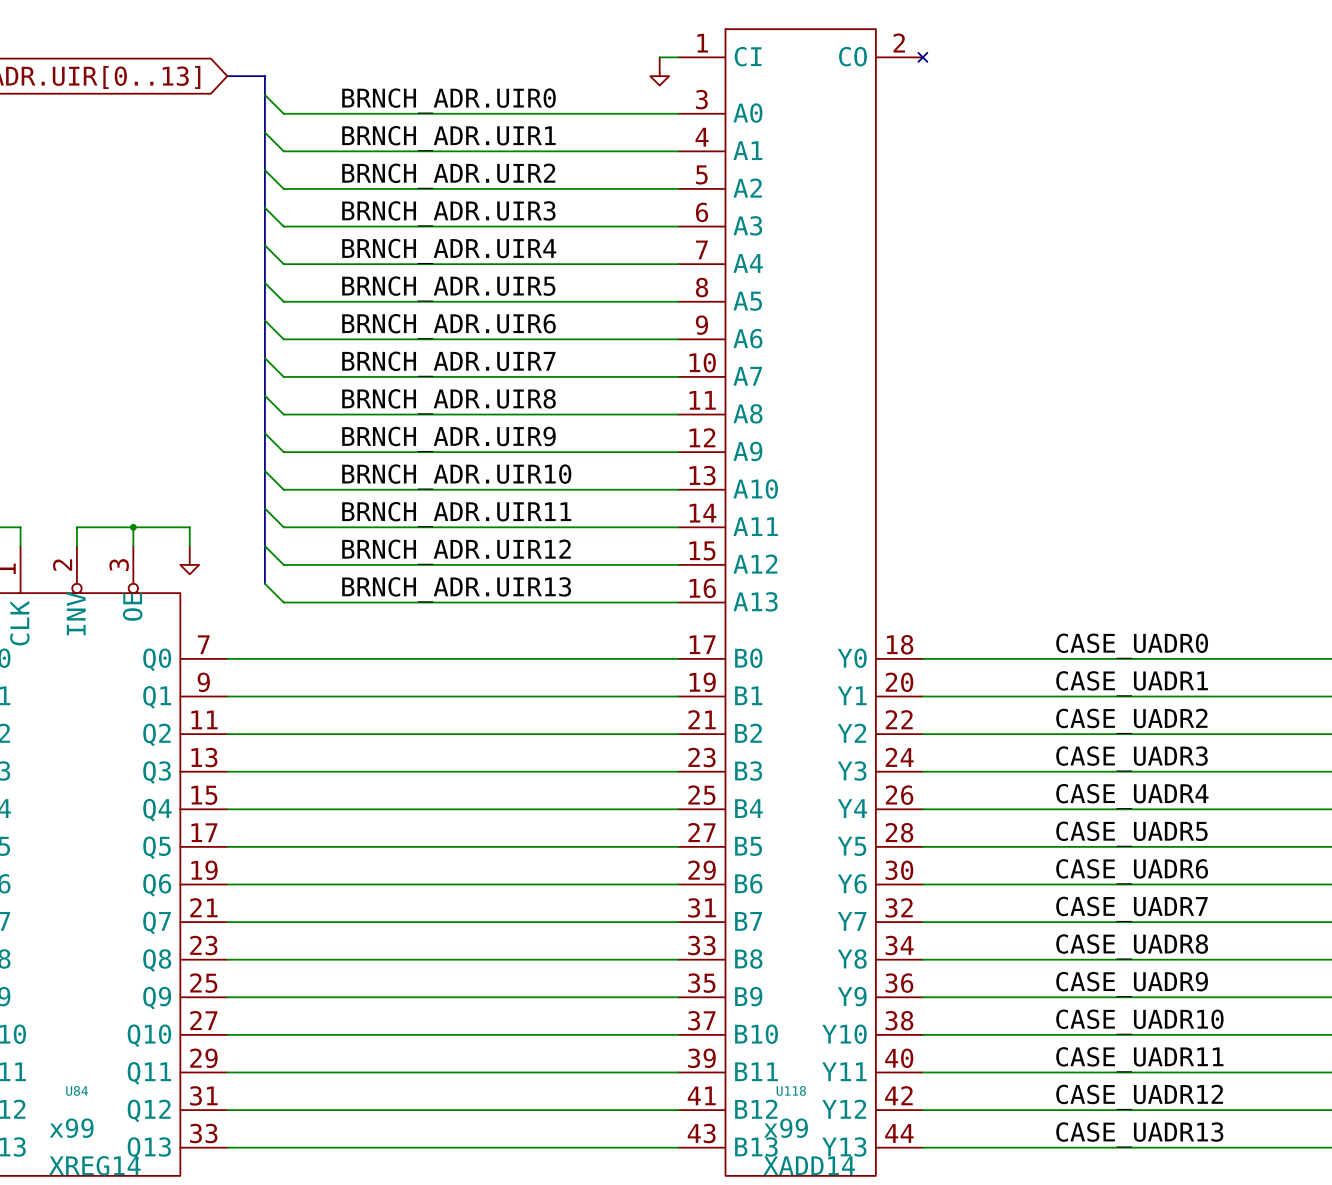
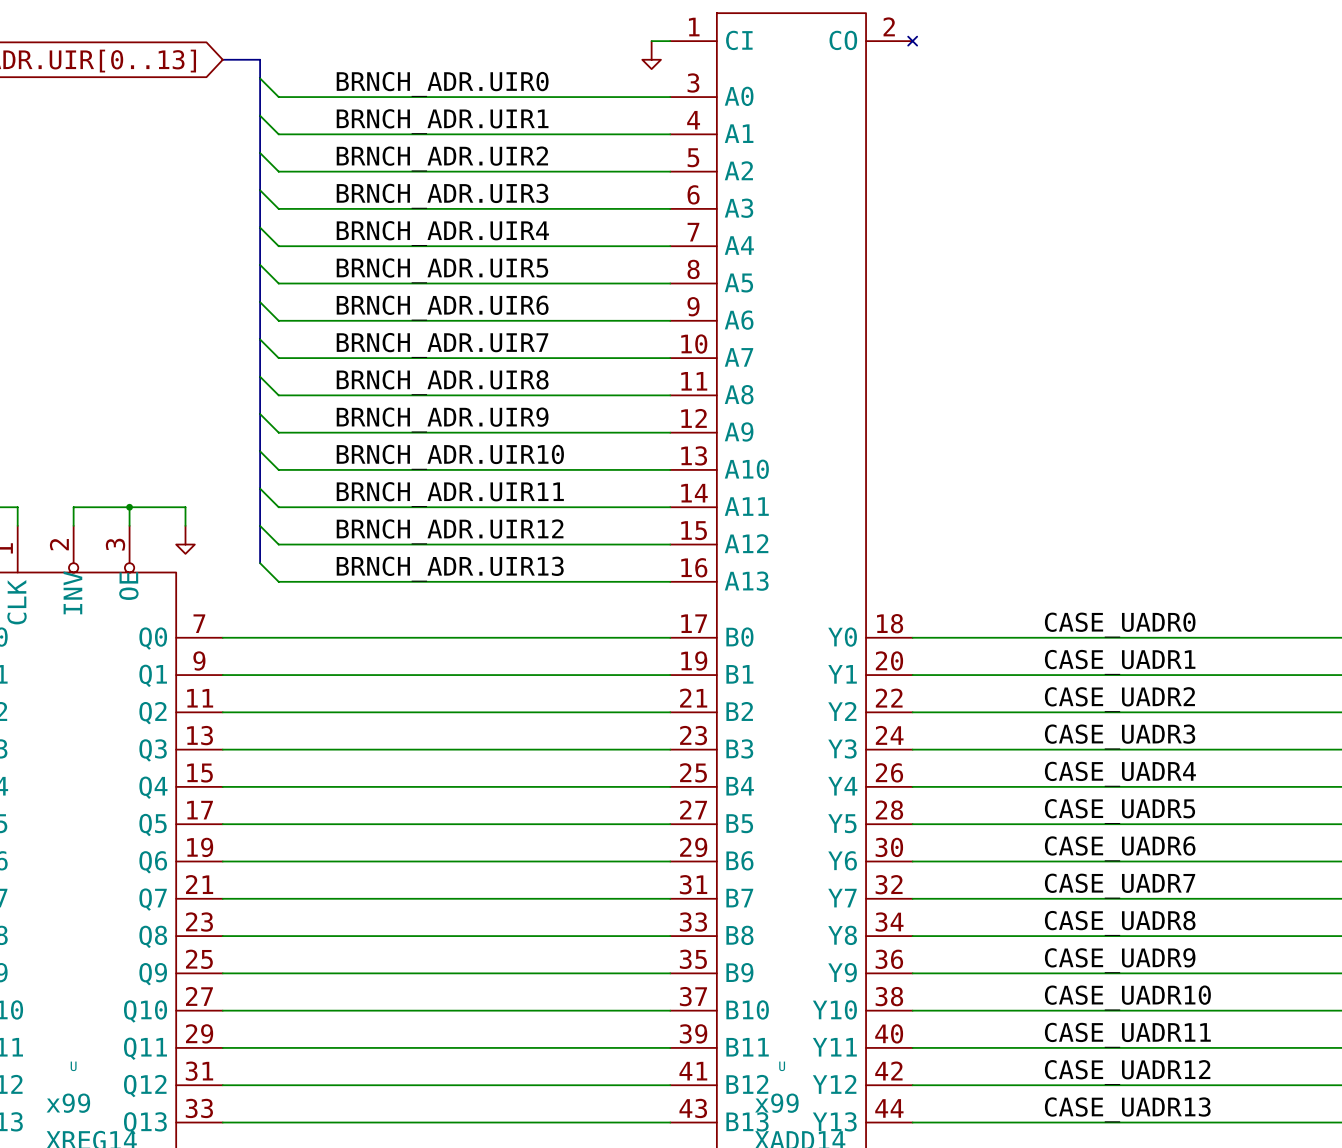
U84 name: U84 (77, 1090) -> U (73, 1066)
U118 name: U118 (791, 1090) -> U (782, 1066)

